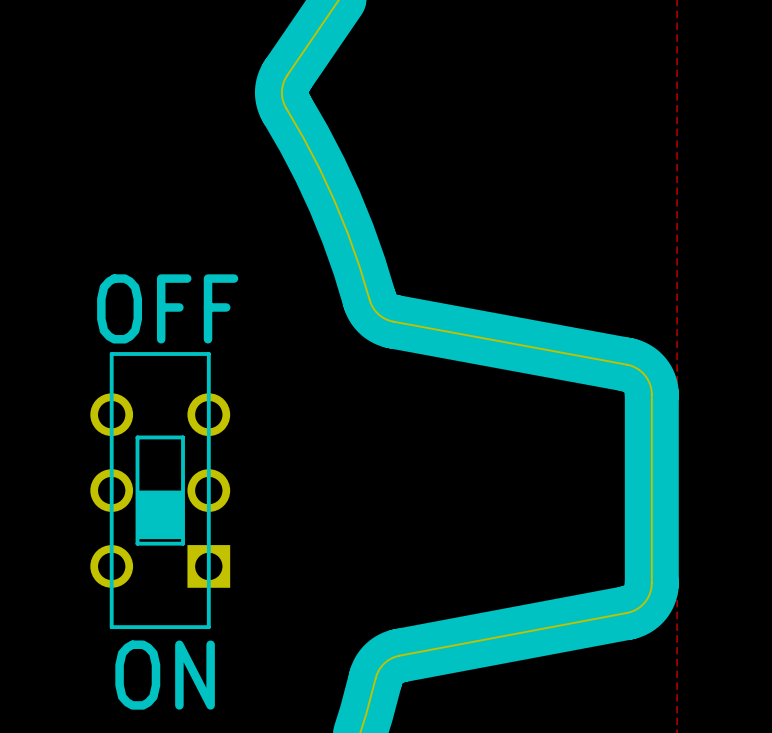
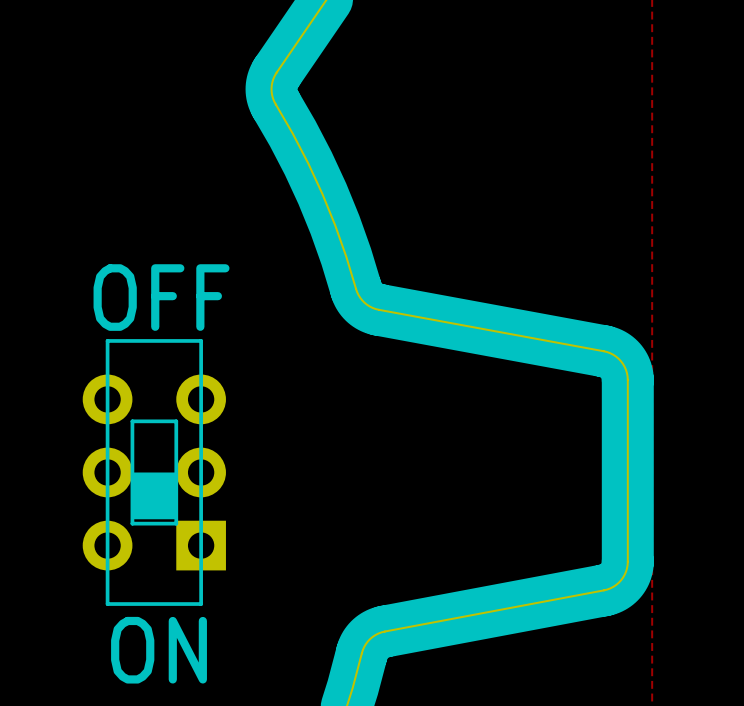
part footprint: [90, 352, 231, 630] -> [82, 339, 226, 606]

